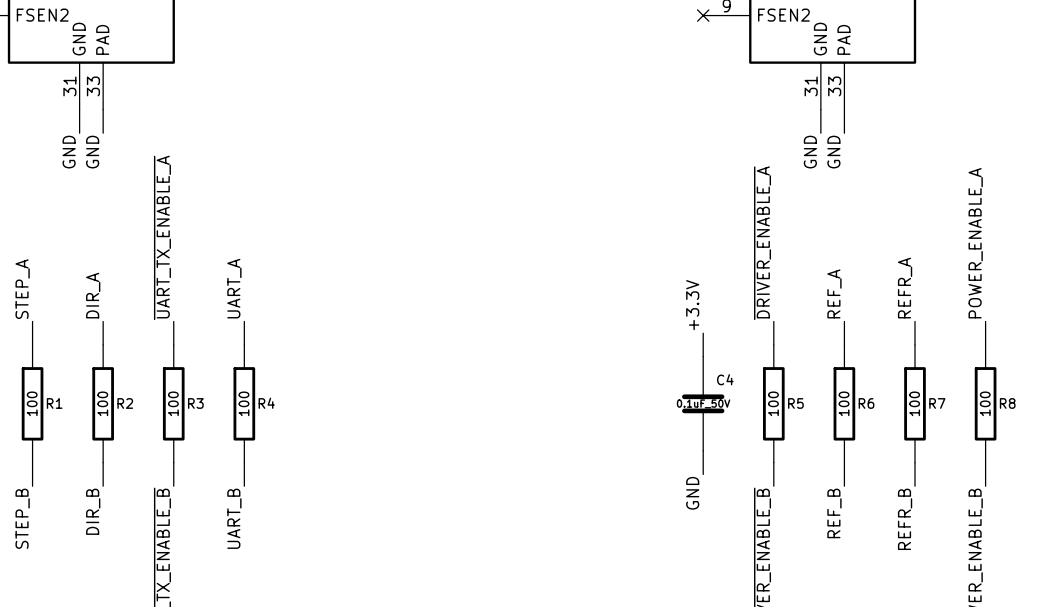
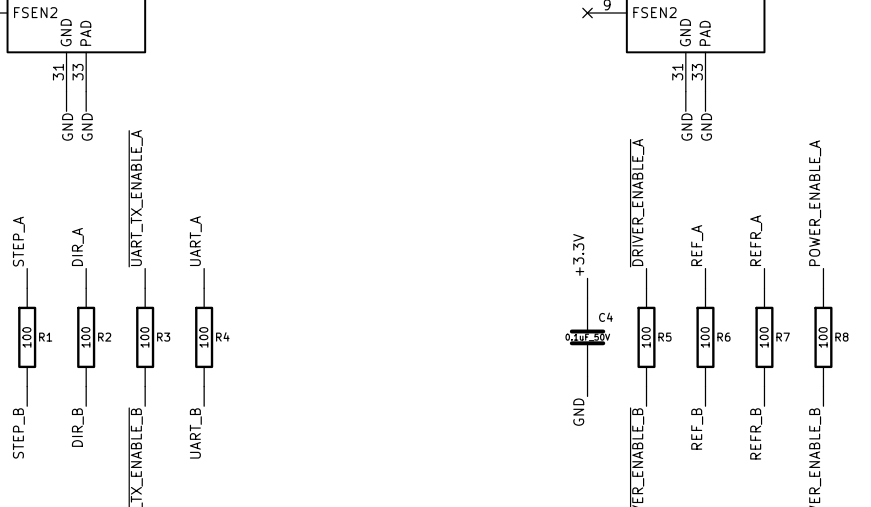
label: GND (69, 152) -> none
label: none -> GND (67, 127)
label: GND (92, 152) -> none
label: none -> GND (87, 127)
label: GND (810, 152) -> none
label: none -> GND (686, 127)
label: GND (833, 152) -> none
label: none -> GND (706, 127)

